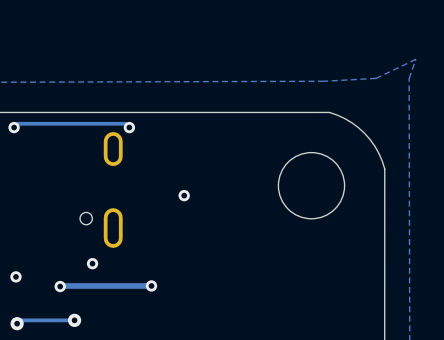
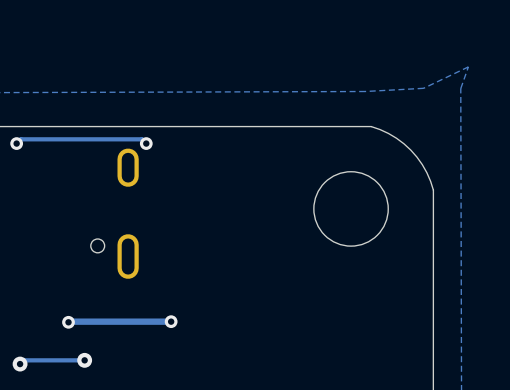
via: (184, 195) -> none
via: (92, 263) -> none
via: (15, 276) -> none

